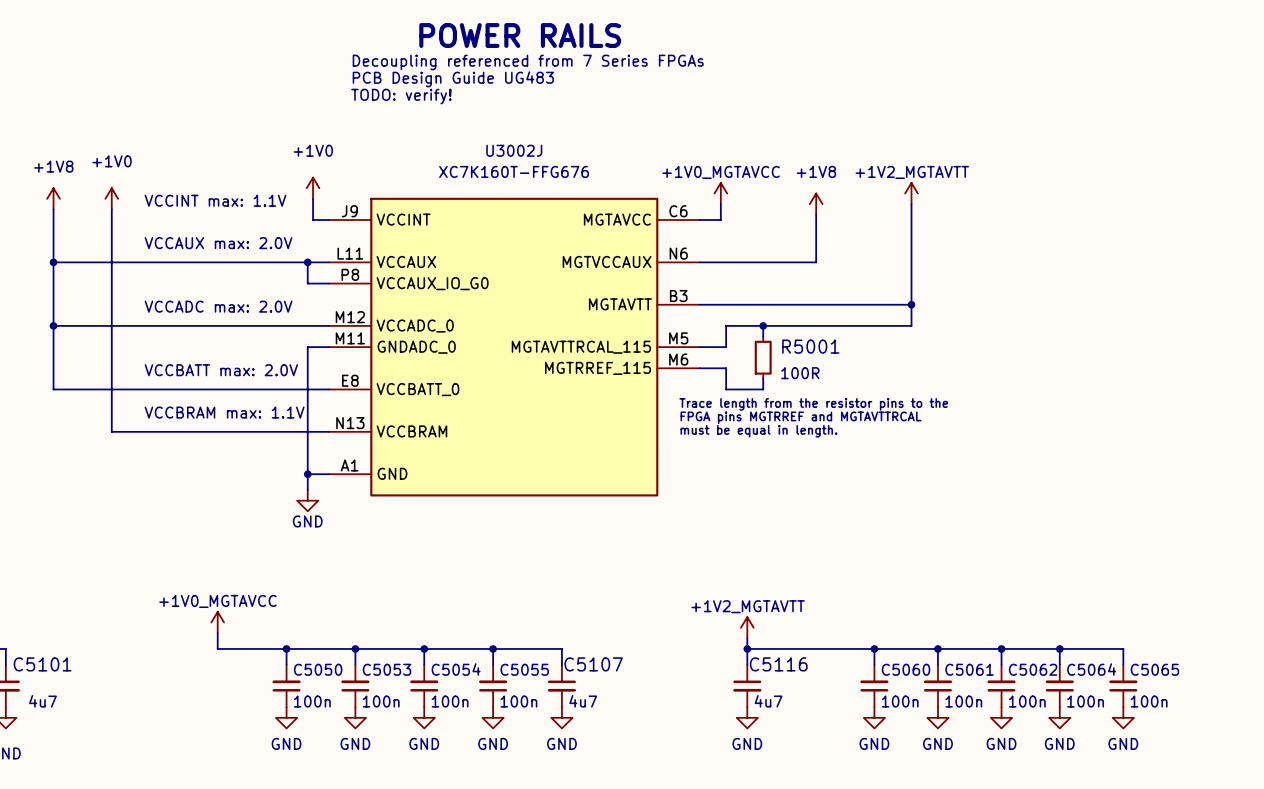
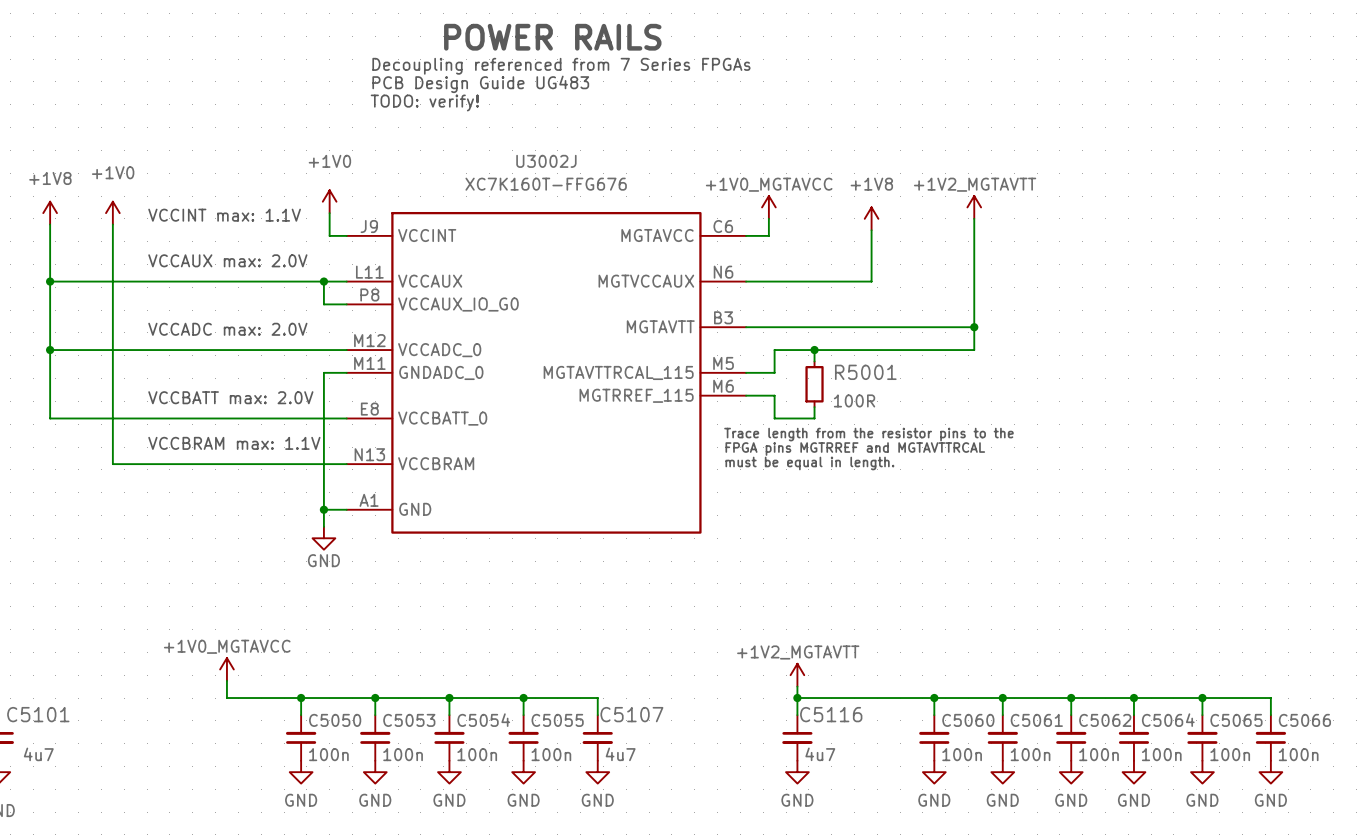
wire: none -> (1202, 698) (1270, 698) (1270, 715)
junction: none -> (1202, 698)
C5066: none -> (1270, 737)
power symbol: none -> GND (1270, 772)

